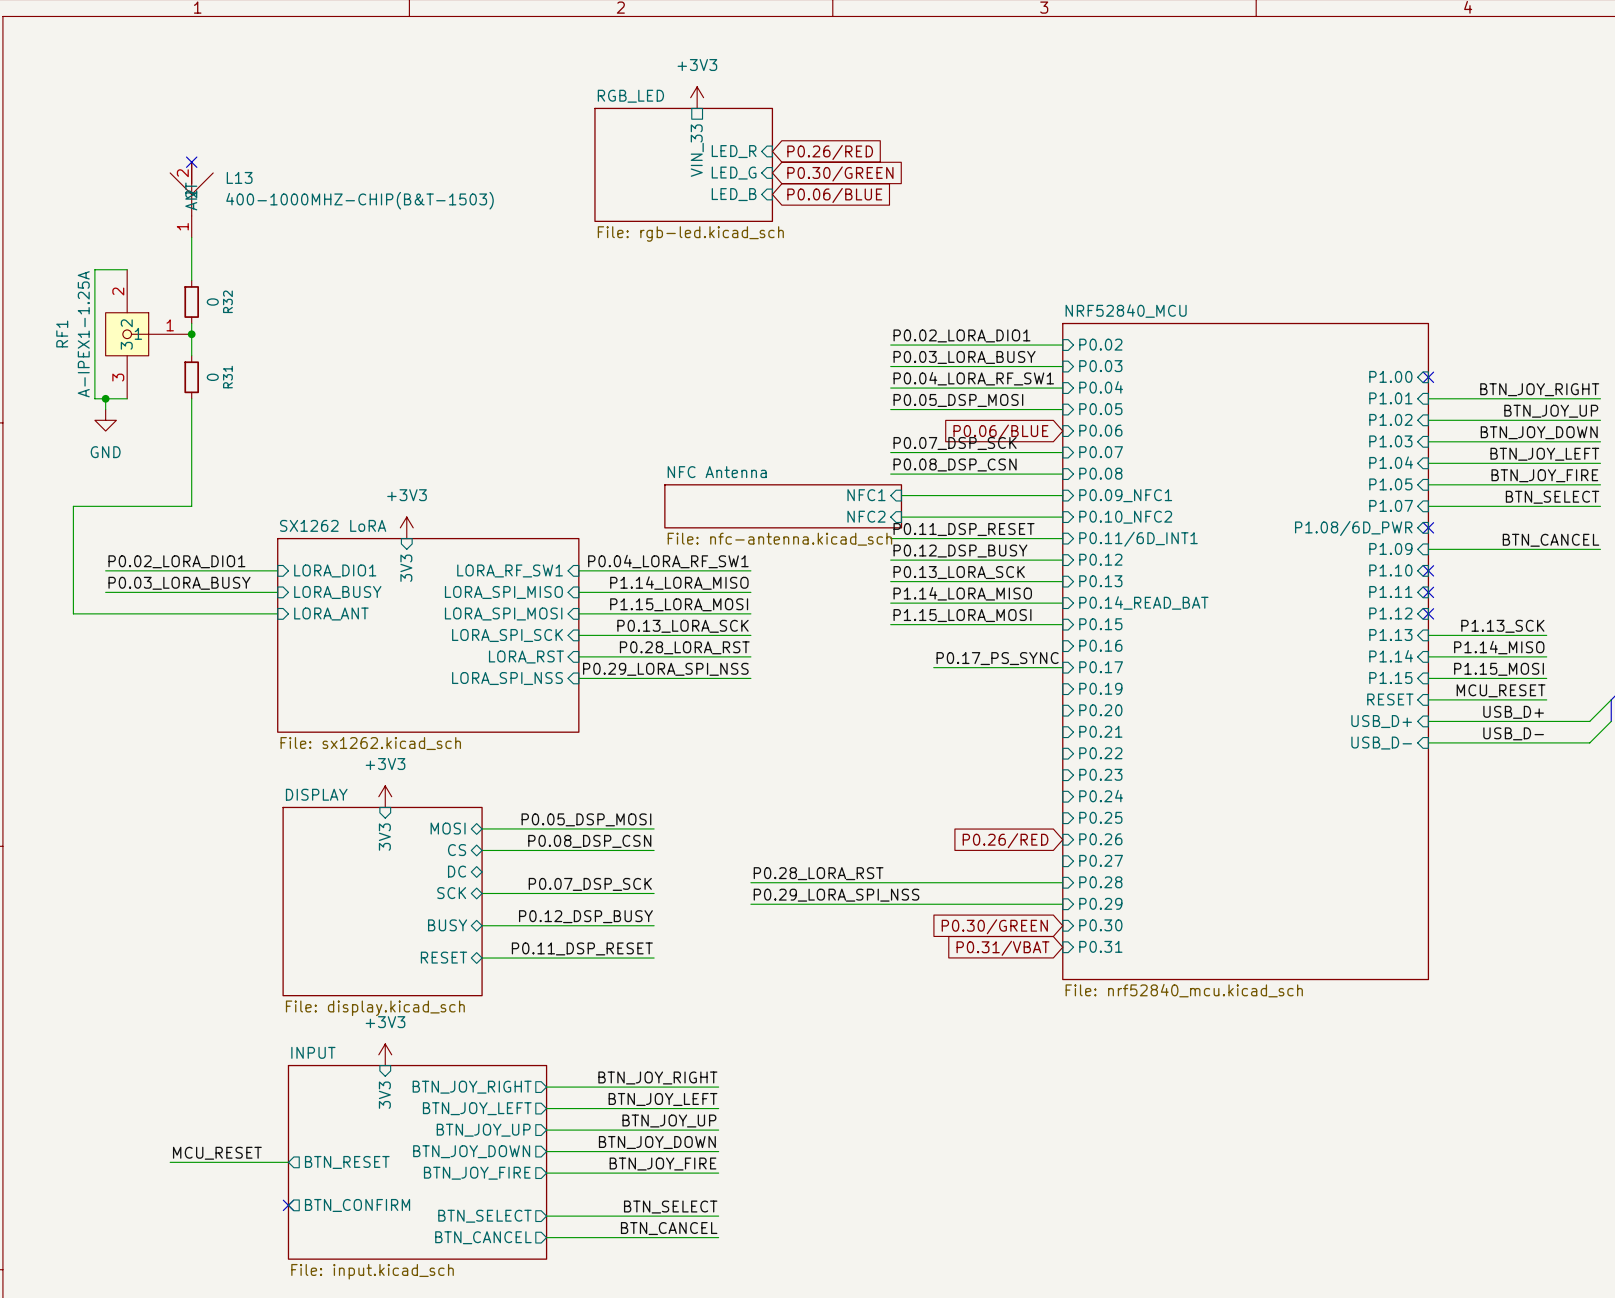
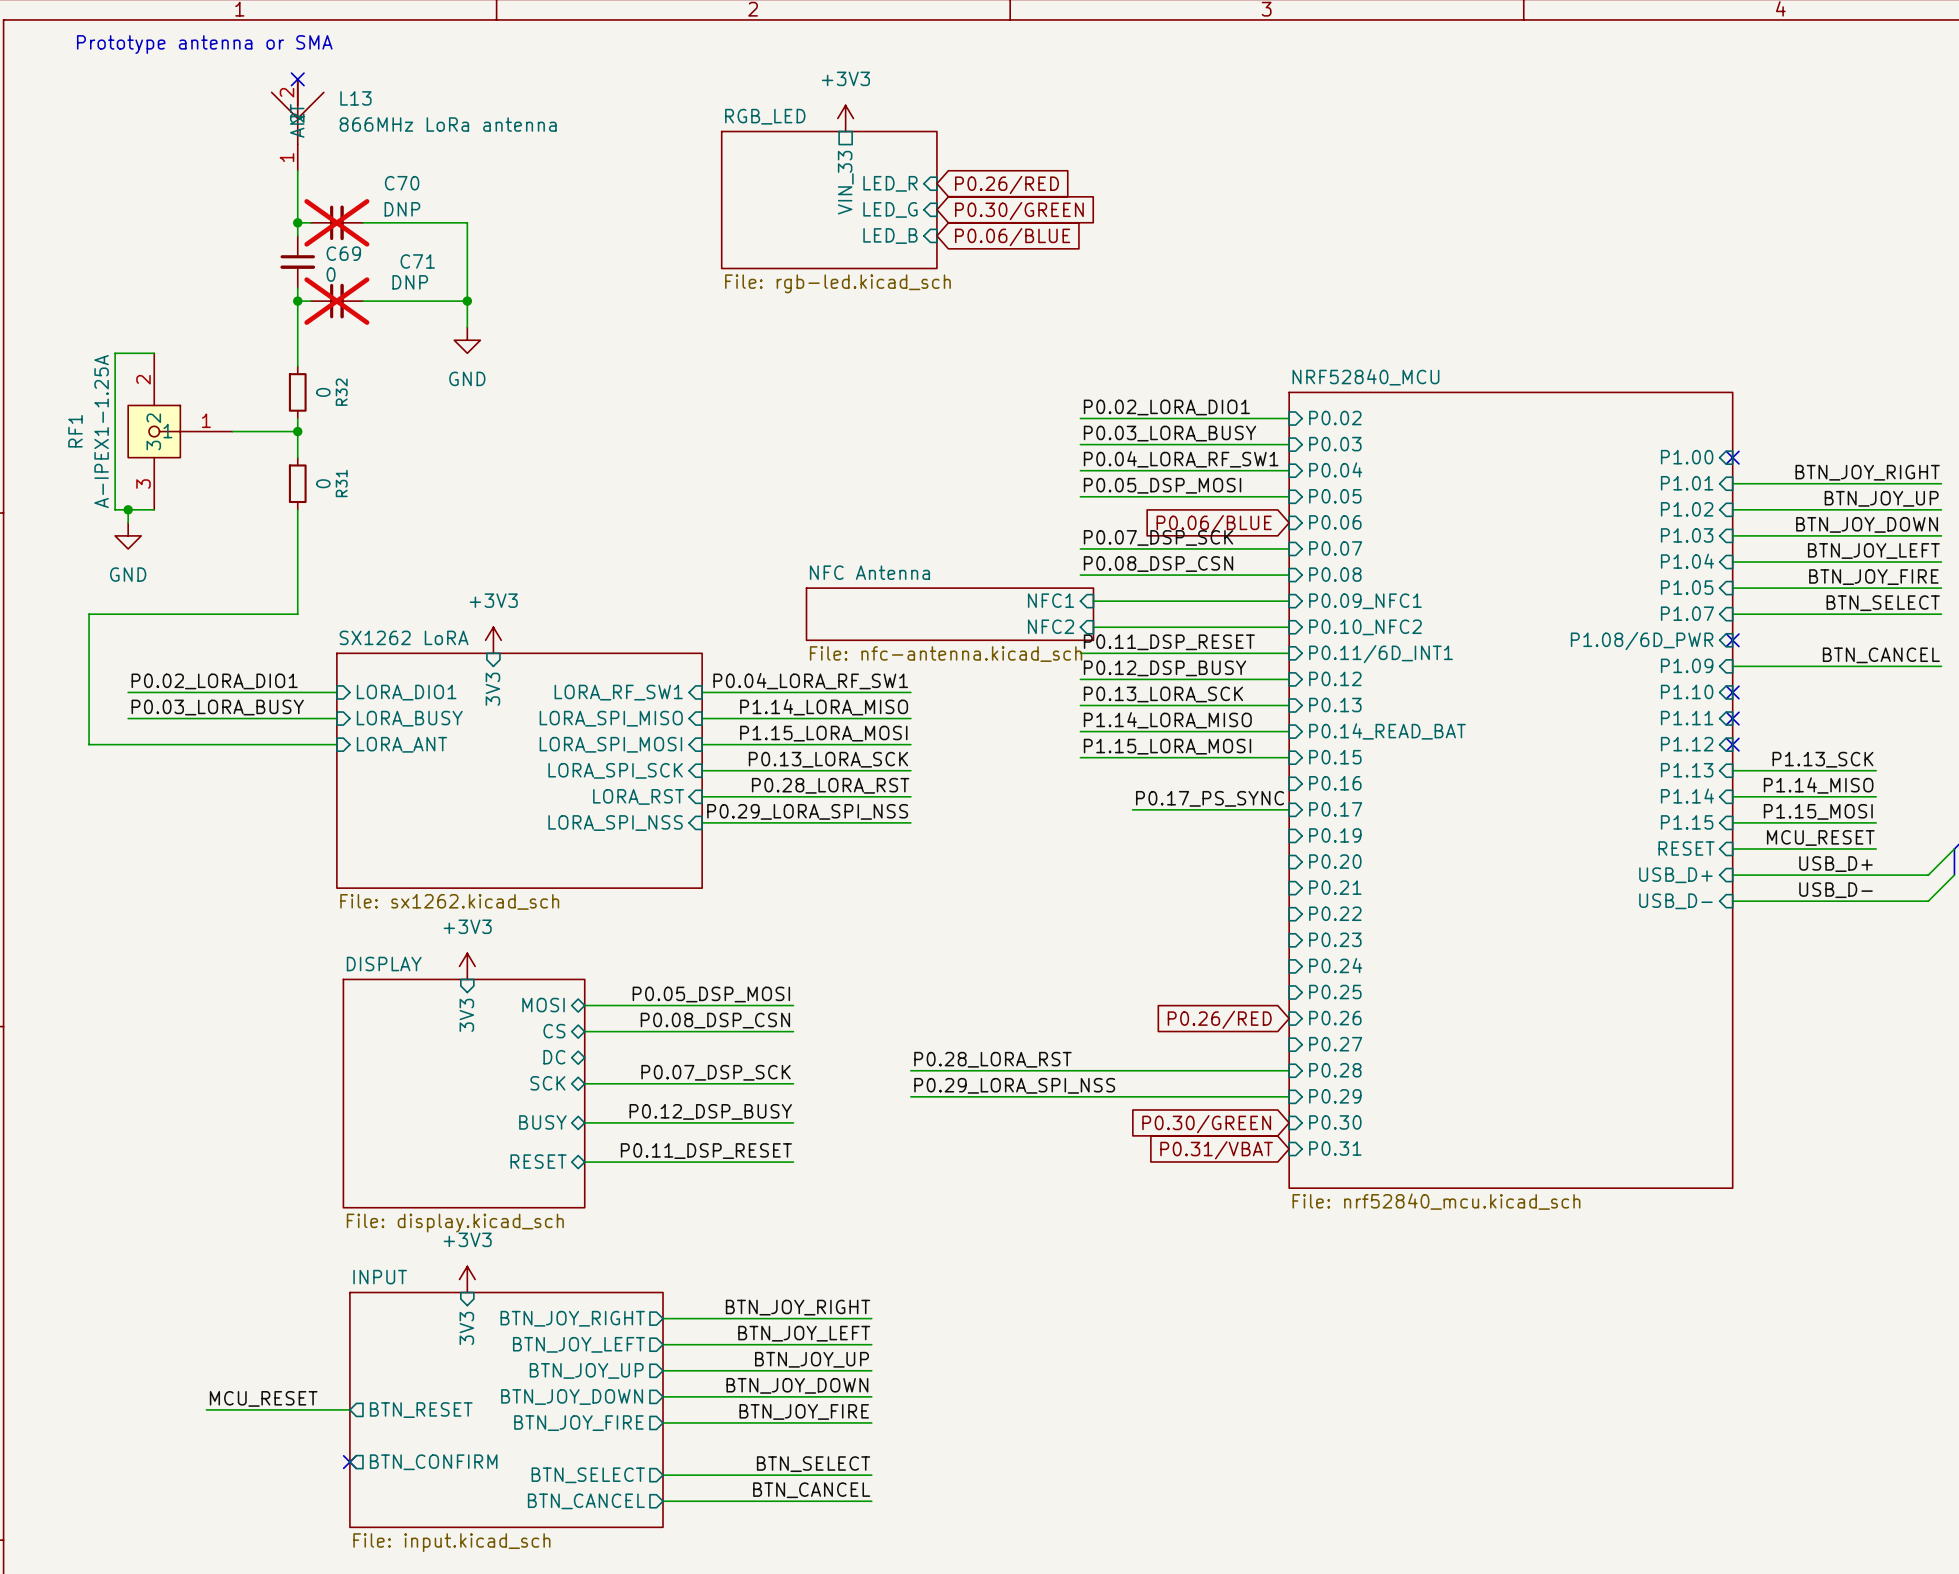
text: none -> Prototype antenna or SMA (204, 44)
no-connect mark: none -> (297, 79)
wire: none -> (297, 170) (297, 235)
no-connect mark: (191, 162) -> none
wire: none -> (297, 222) (310, 222)
junction: none -> (297, 222)
C70: none -> DNP (336, 222)
wire: none -> (362, 222) (467, 222) (467, 327)
L13 position: (191, 199) -> (297, 125)
L13 value: 400-1000MHZ-CHIP(B&T-1503) (360, 200) -> 866MHz LoRa antenna (448, 124)
C69: none -> 0 (297, 261)
wire: (191, 237) (191, 280) -> none
wire: none -> (297, 288) (297, 366)
wire: none -> (297, 301) (310, 301)
junction: none -> (297, 301)
C71: none -> DNP (336, 301)
wire: none -> (362, 301) (467, 301)
junction: none -> (467, 301)
wire: (127, 269) (94, 269) (94, 291) -> (154, 353) (115, 353)
power symbol: none -> GND (467, 340)
R32 position: (191, 302) -> (297, 392)
wire: (191, 323) (191, 355) -> (297, 431) (232, 431)
RF1 position: (148, 334) -> (180, 431)
junction: (191, 334) -> none
wire: none -> (297, 418) (297, 457)
junction: none -> (297, 431)
R31 position: (191, 377) -> (297, 483)
wire: (94, 398) (127, 398) -> (115, 483) (115, 509) (154, 509)
wire: (105, 398) (105, 409) -> (128, 509) (128, 522)
junction position: (105, 398) -> (128, 509)
wire: (191, 398) (191, 506) -> (297, 509) (297, 614) (232, 614)
power symbol position: GND (105, 420) -> GND (128, 535)

